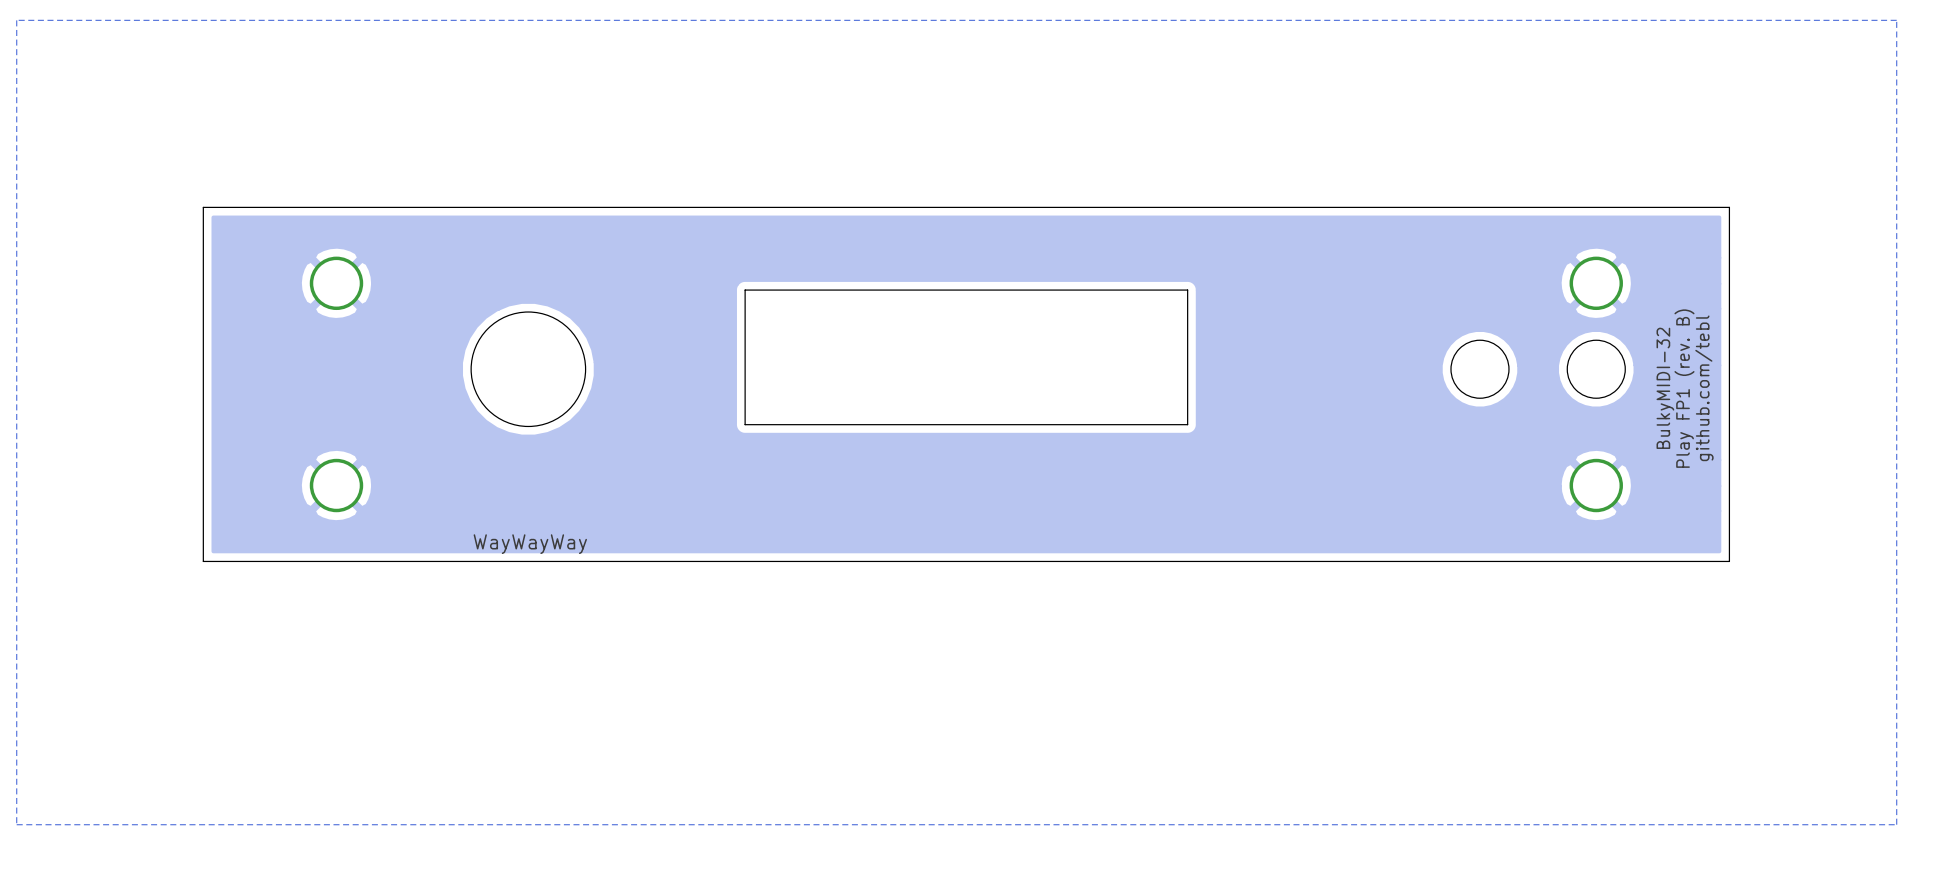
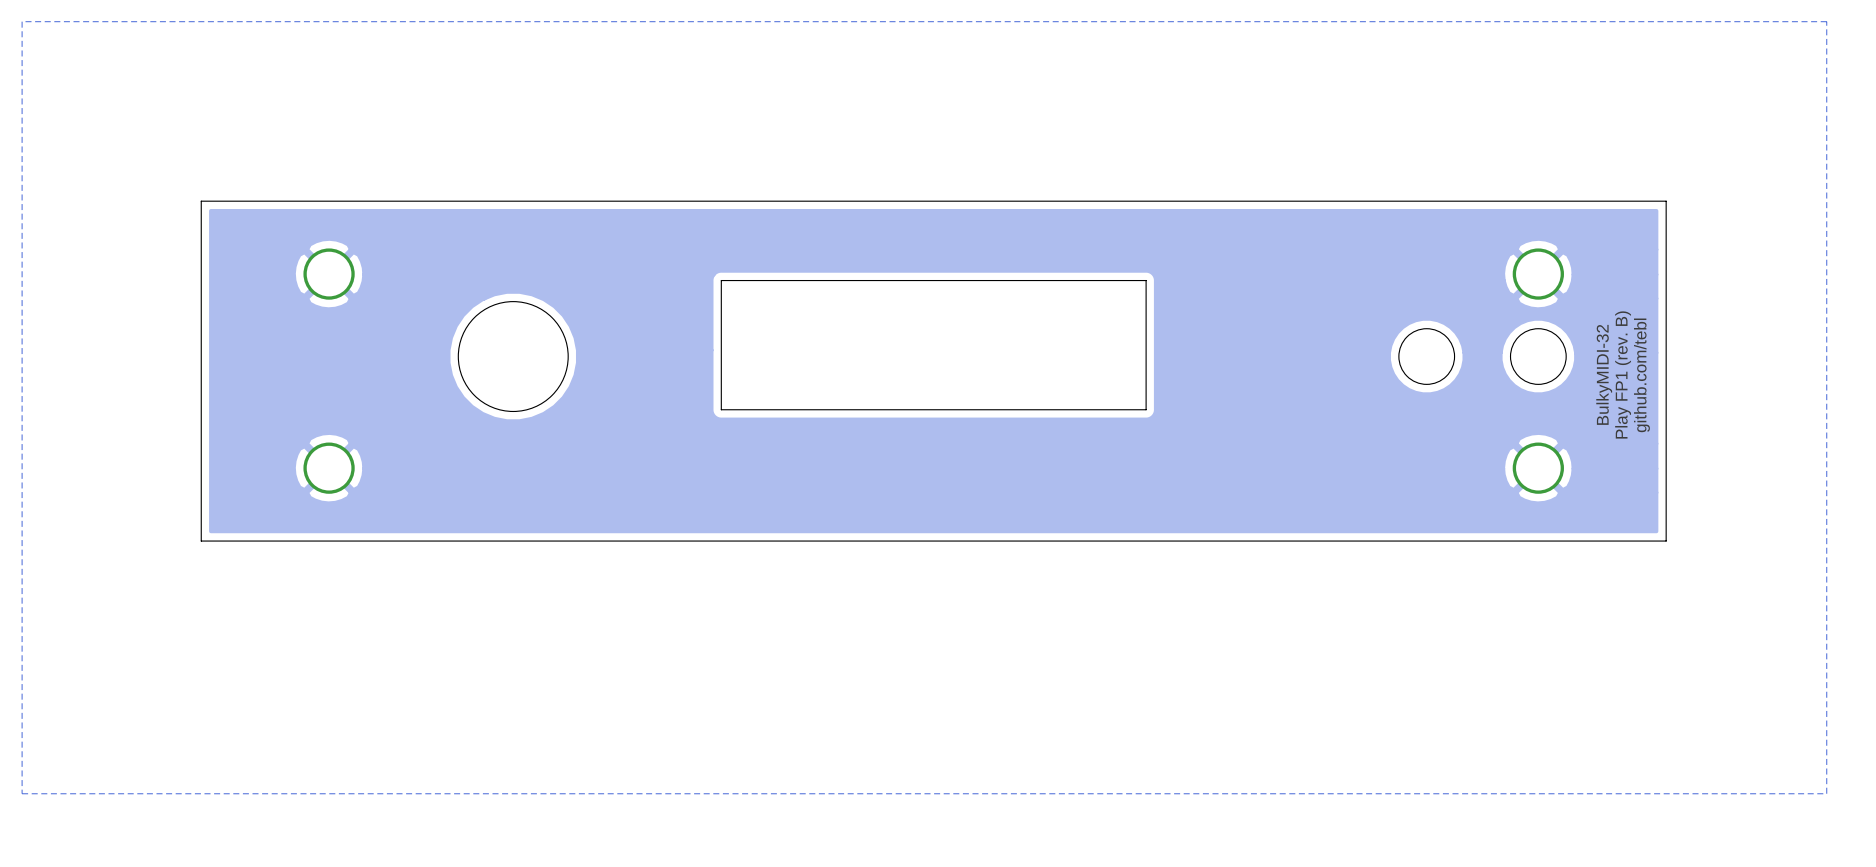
text: WayWayWay (530, 544) -> none

